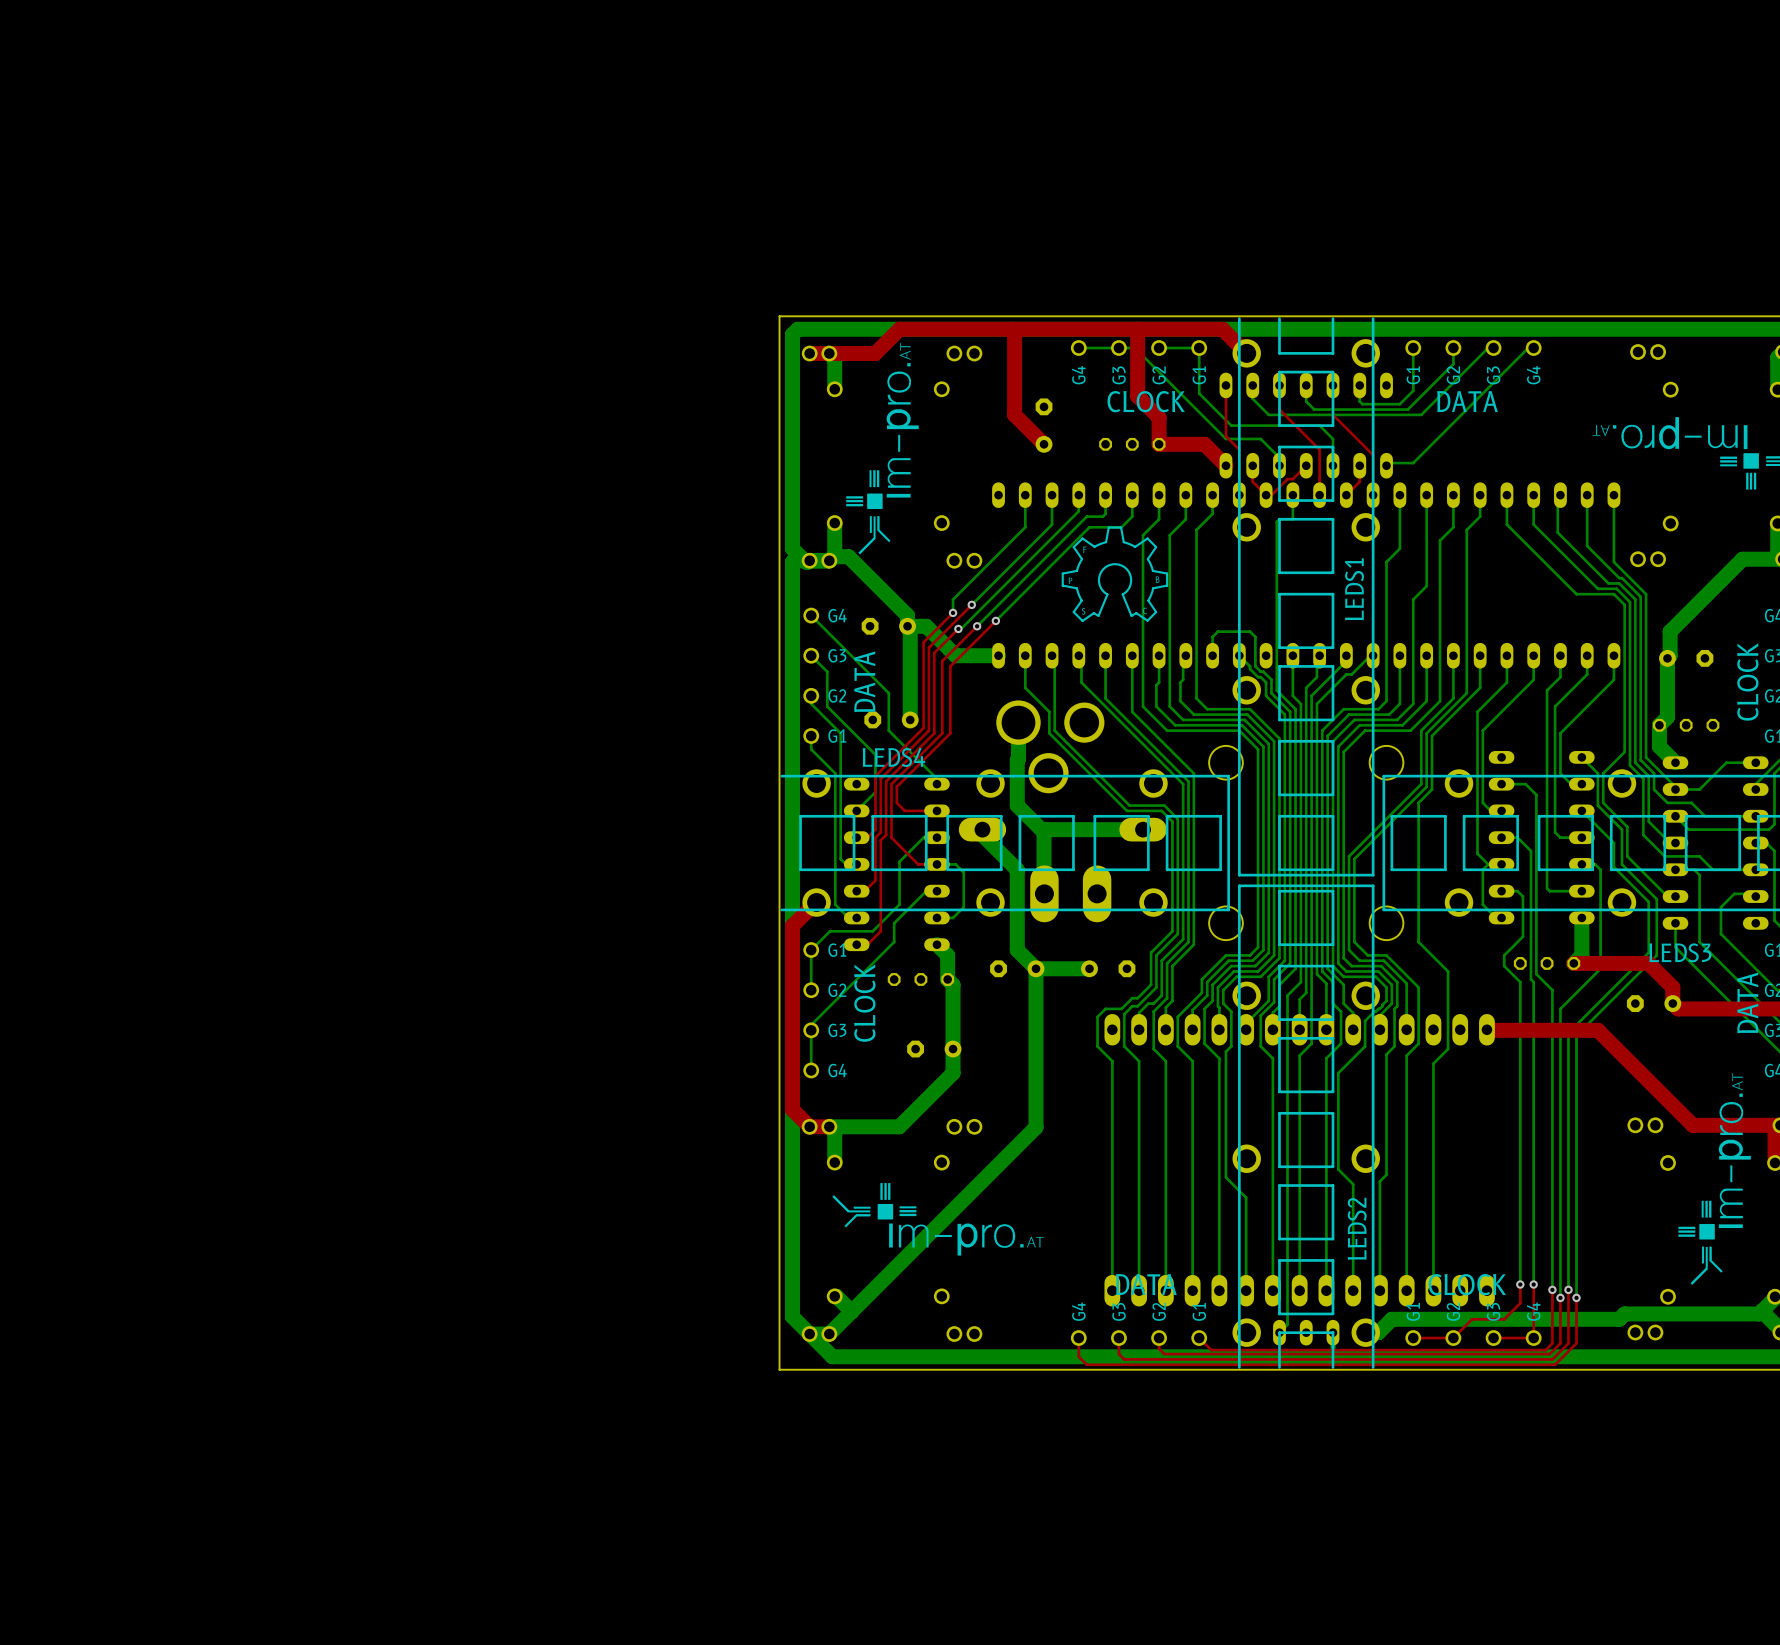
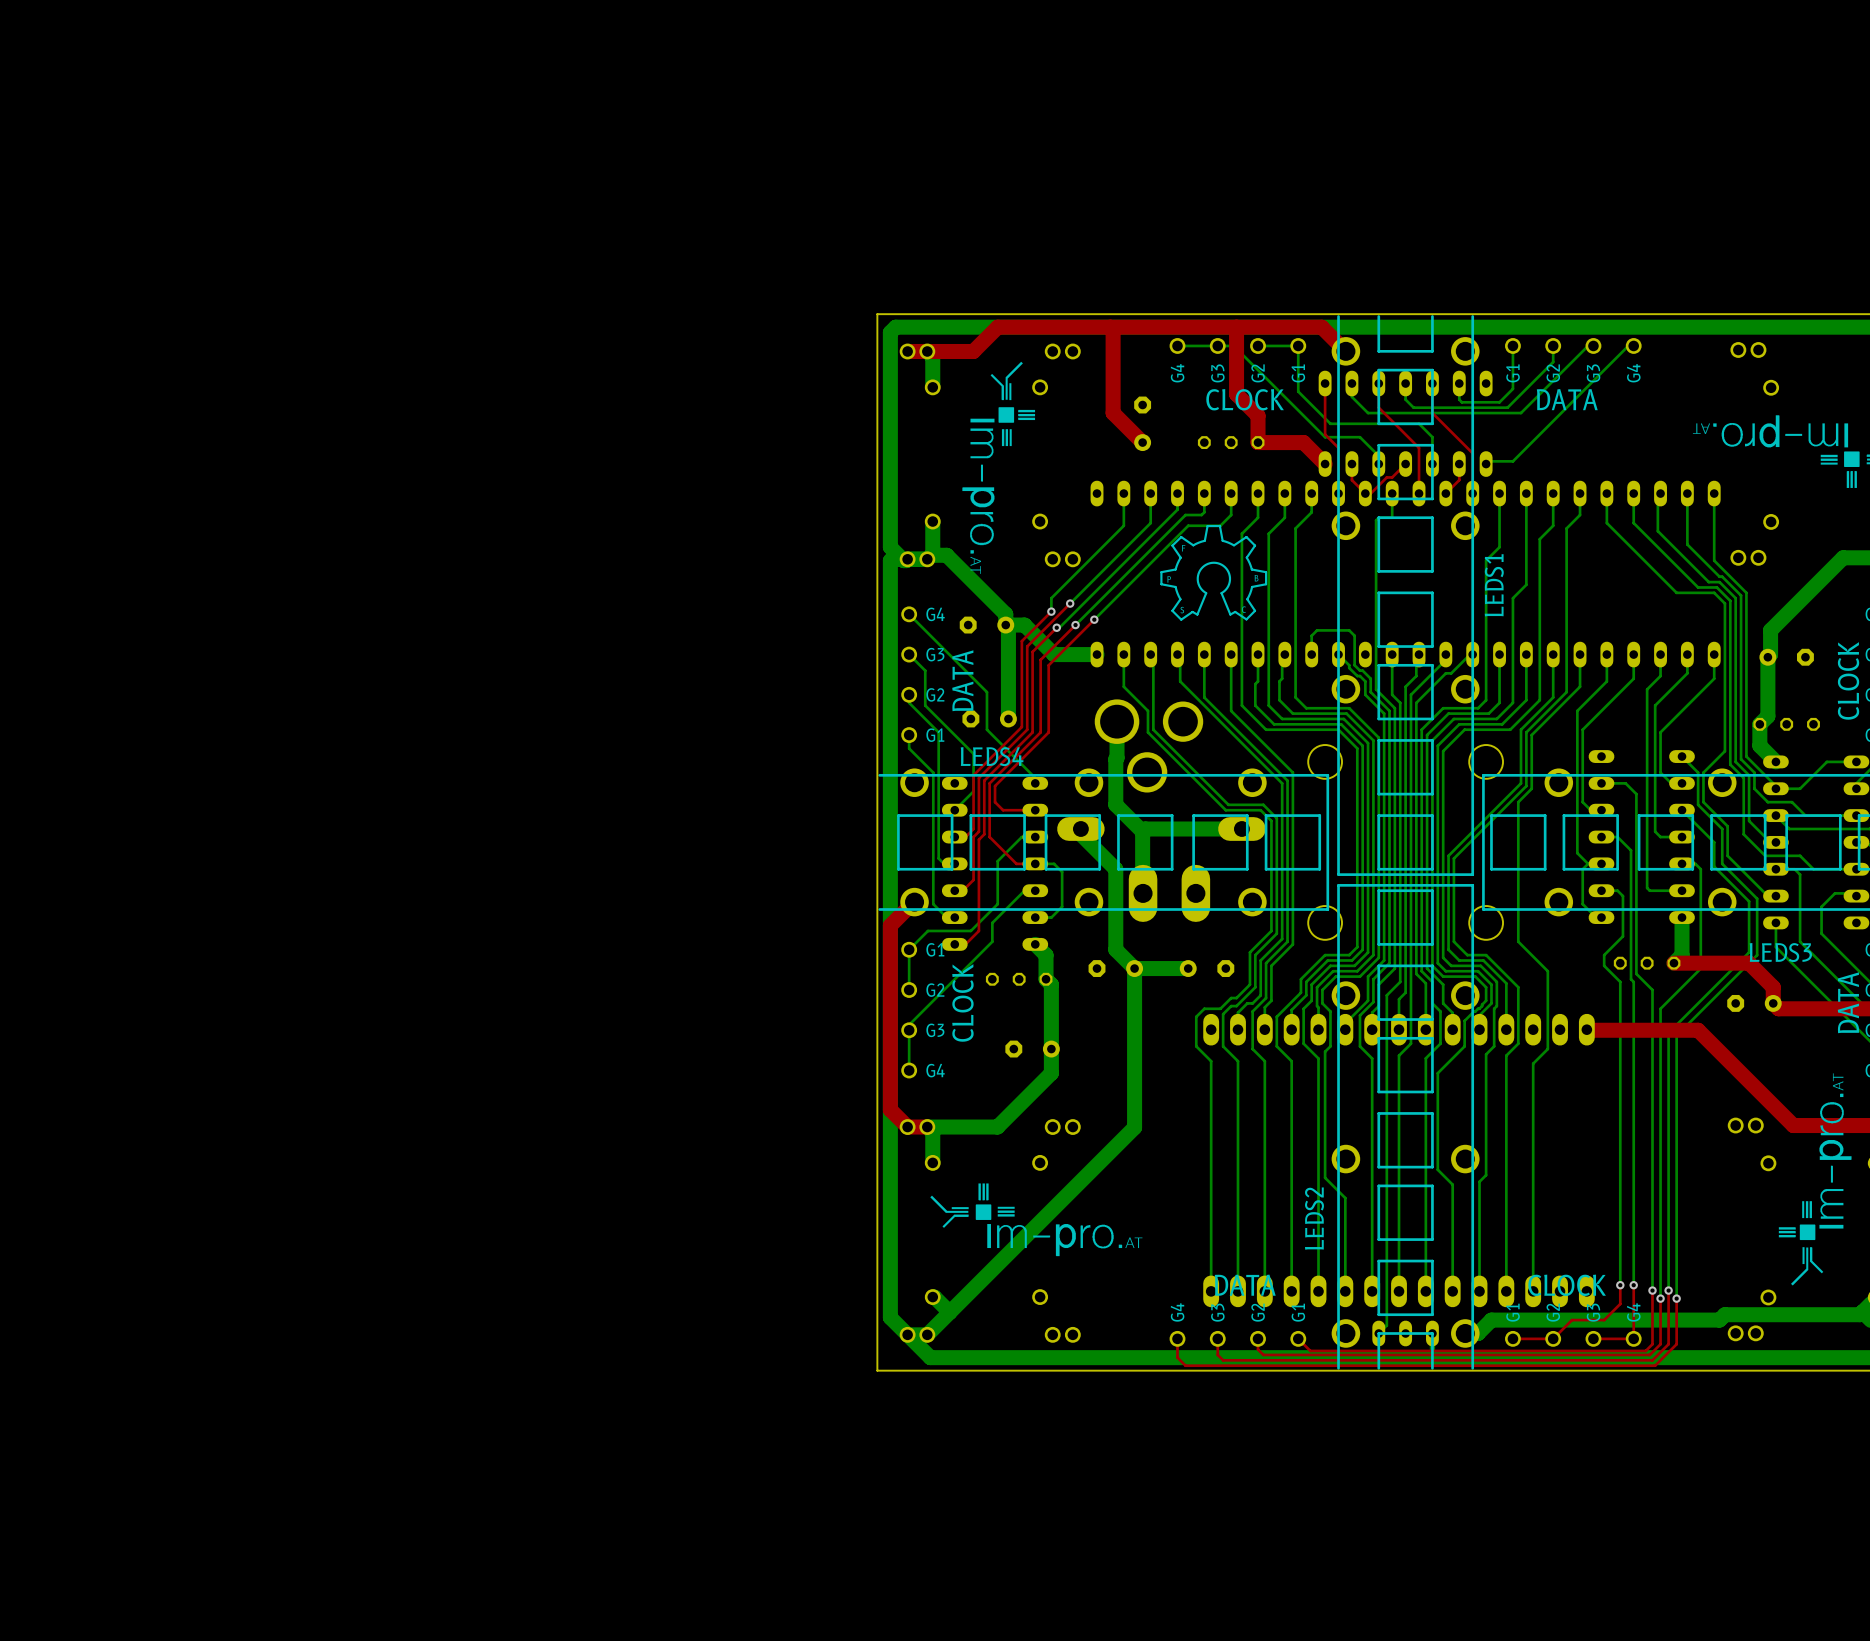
drawing: [846, 342, 919, 555] -> none
drawing: none -> [962, 361, 1036, 574]
LEDS1 name position: LEDS1 (1354, 589) -> LEDS1 (1494, 585)
LEDS2 name position: LEDS2 (1357, 1228) -> LEDS2 (1314, 1218)

